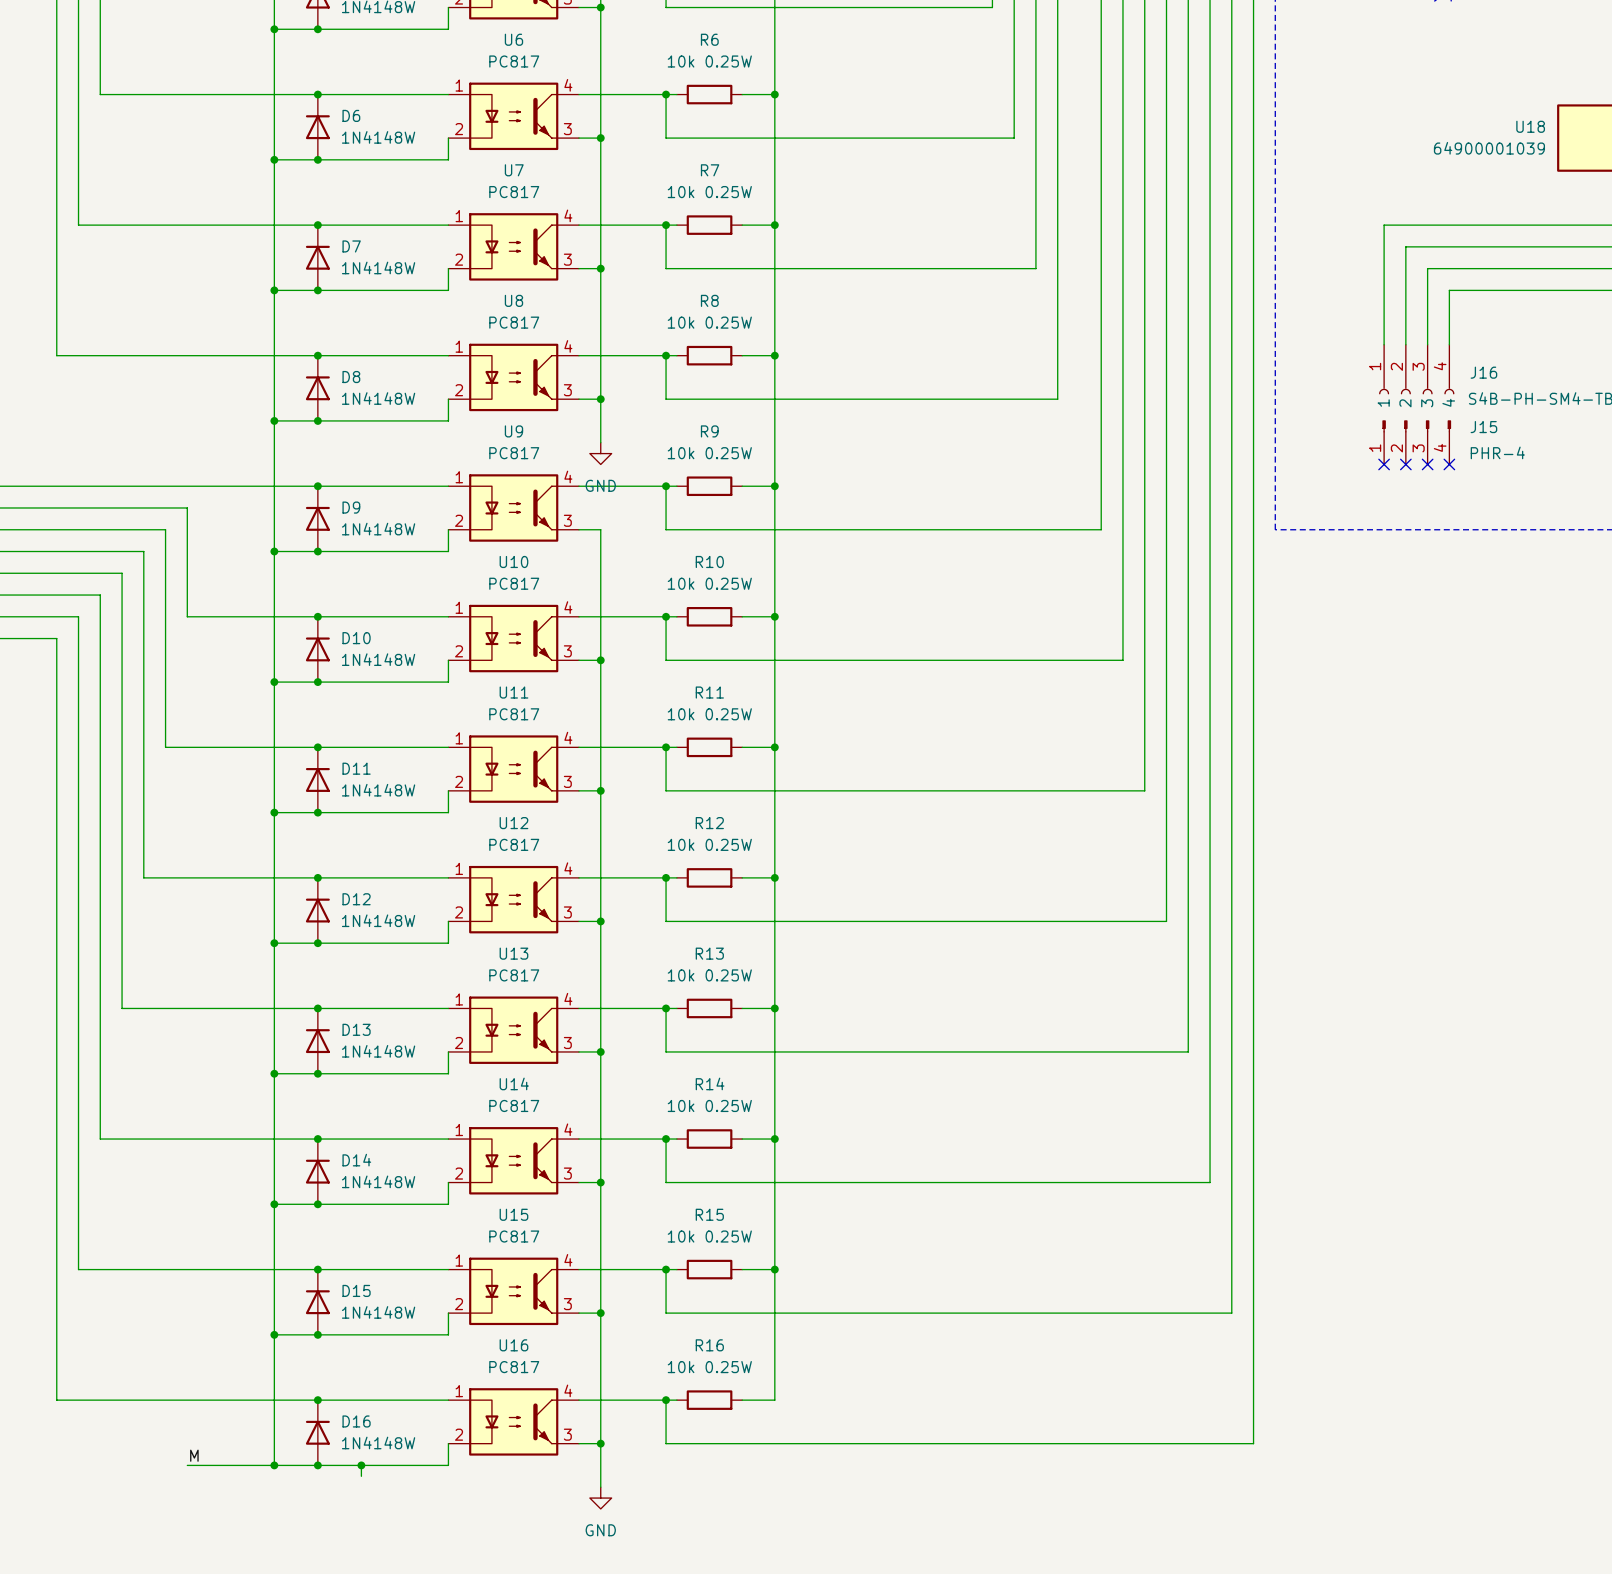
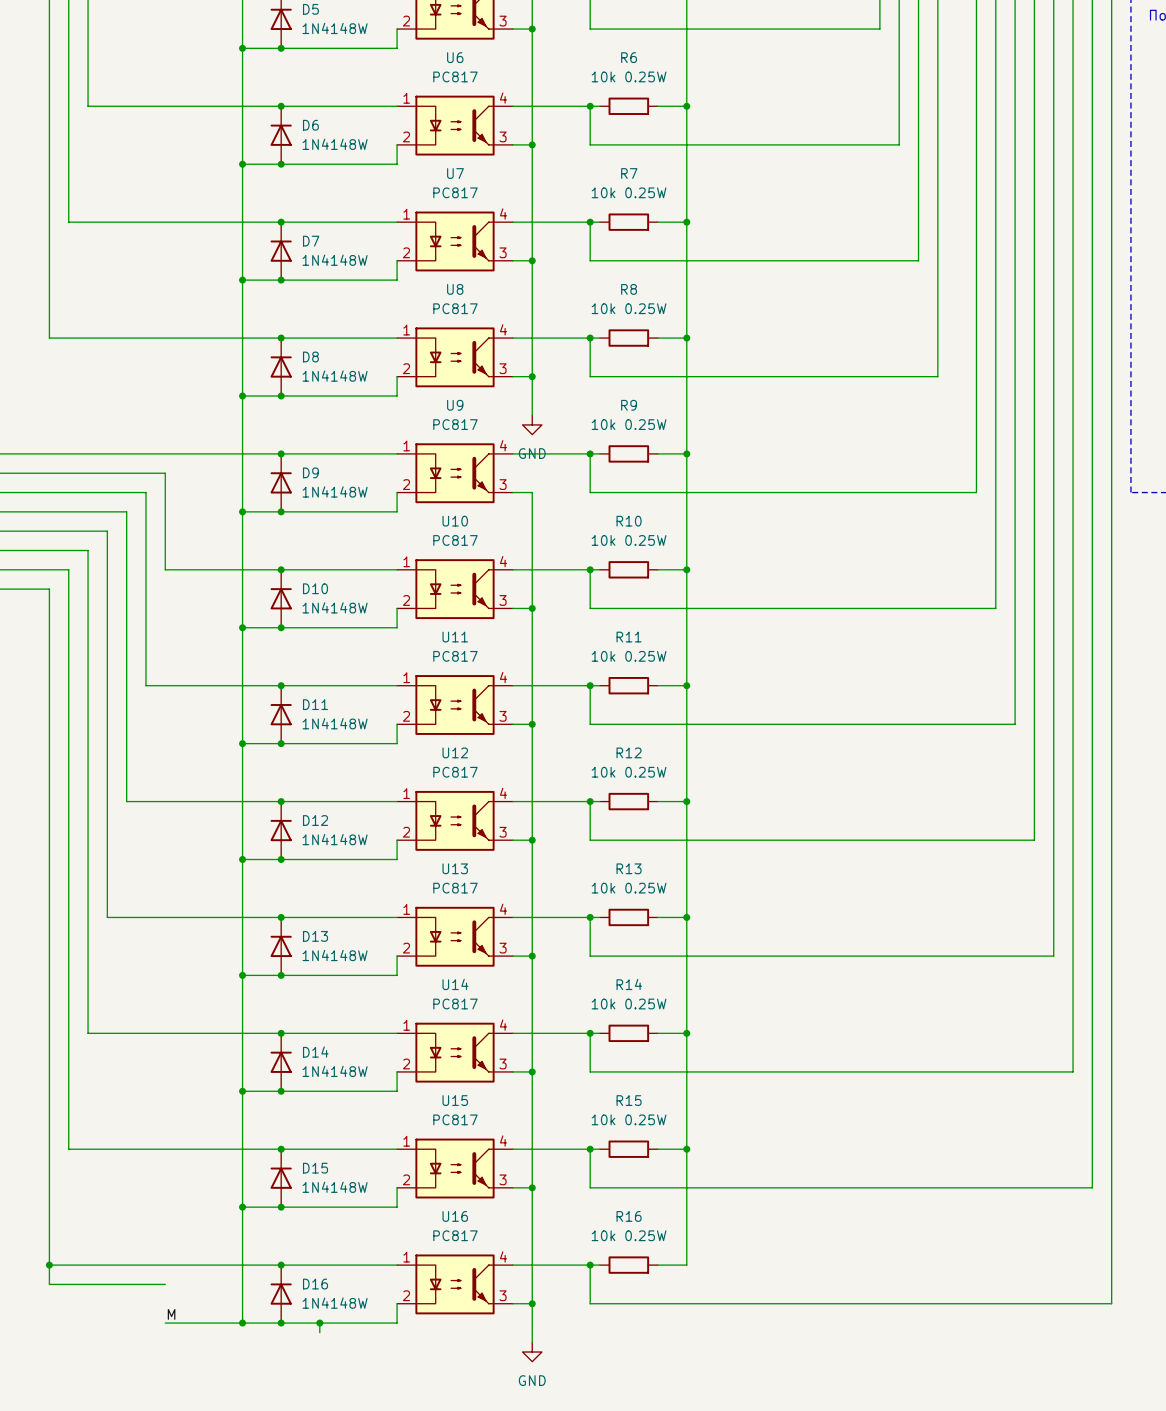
wire: none -> (49, 1265) (49, 1284) (165, 1284)
junction: none -> (49, 1265)

